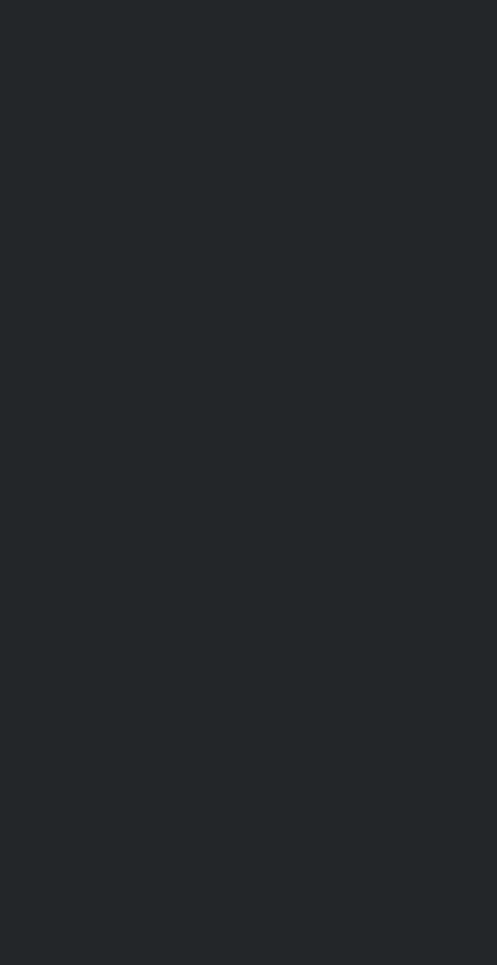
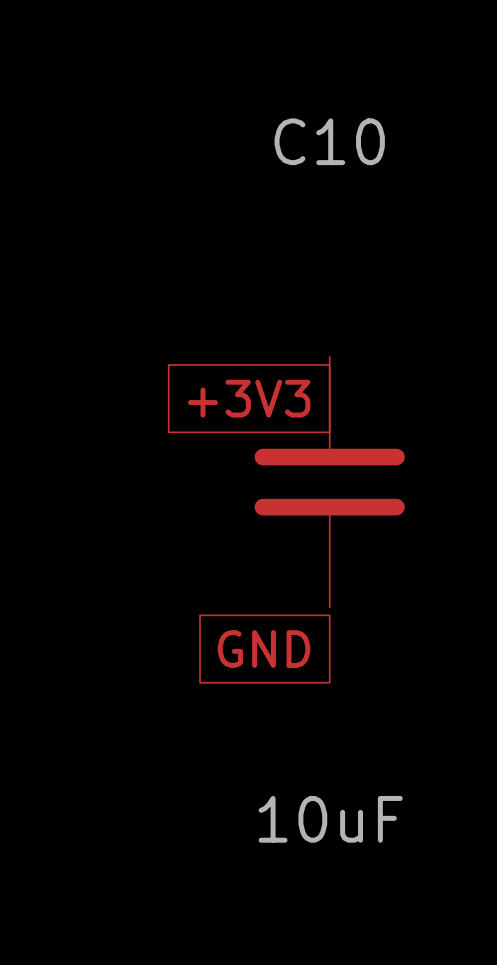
global label: none -> +3V3 (249, 398)
C10: none -> 10uF (329, 482)
global label: none -> GND (264, 649)

